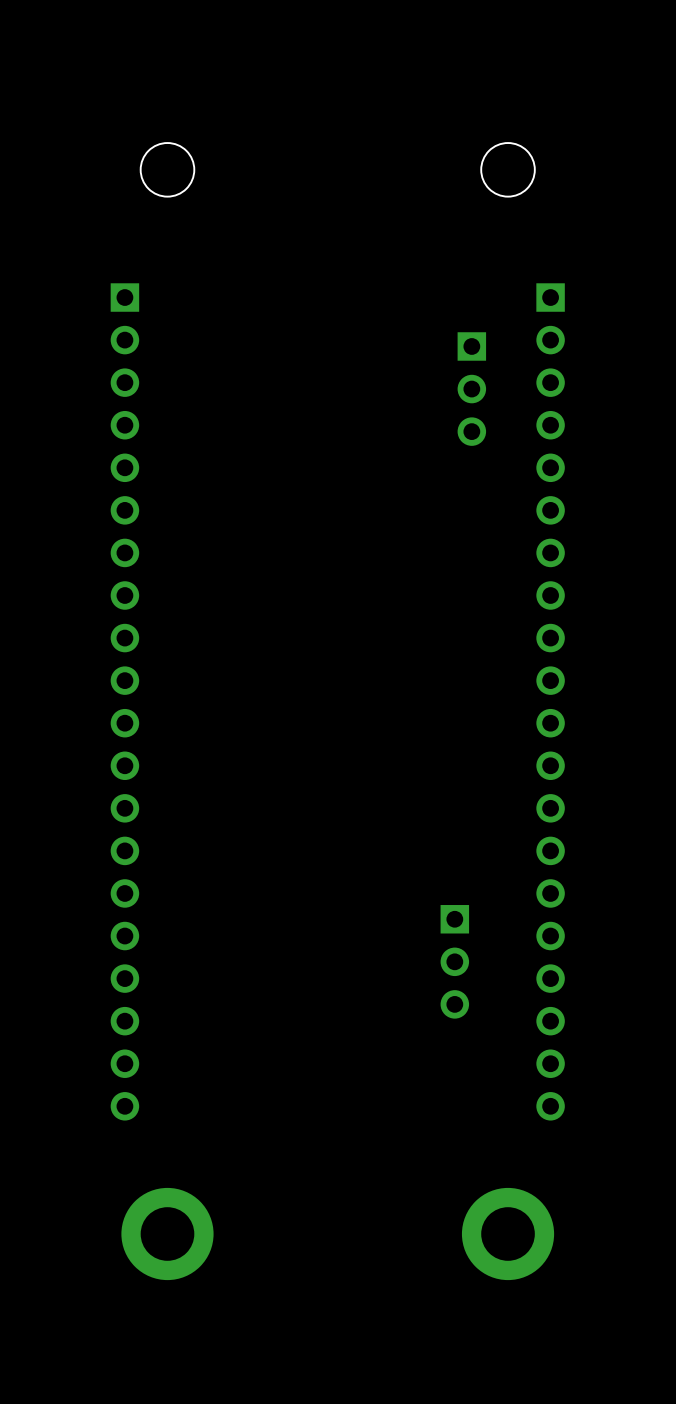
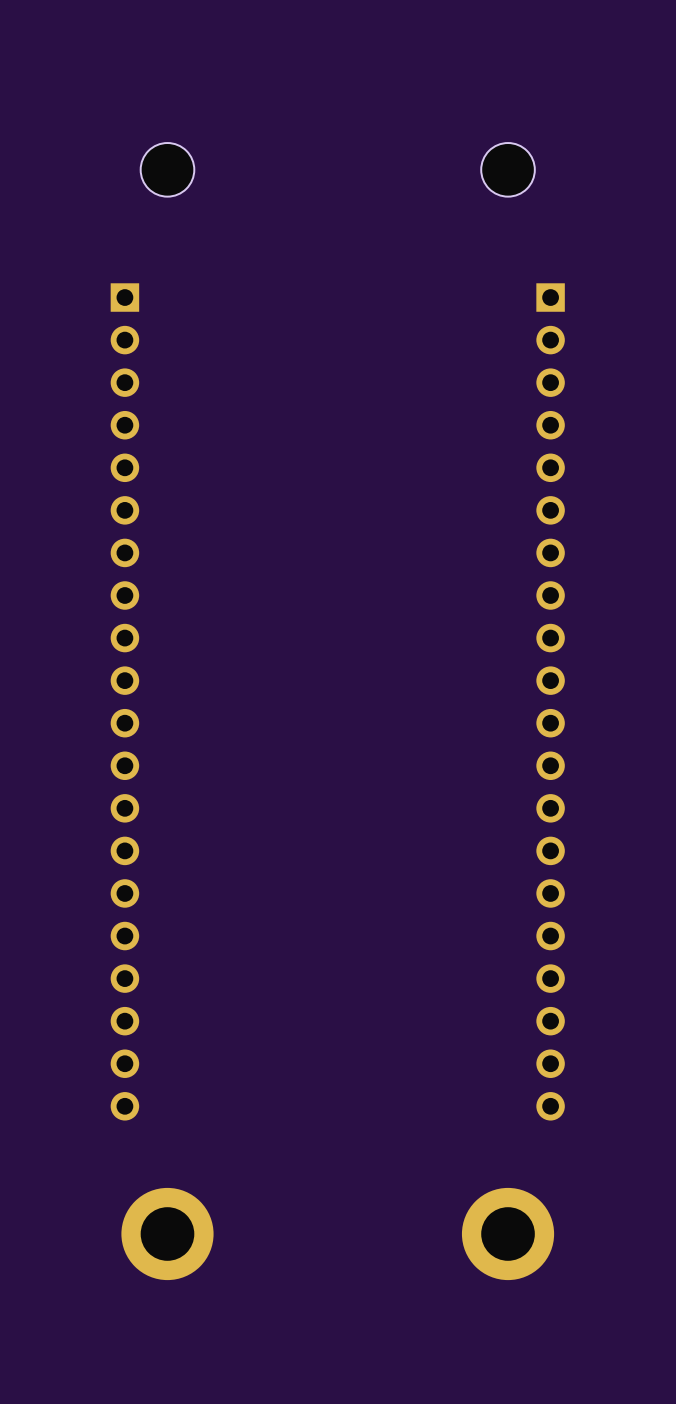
part: (471, 389) -> none
part: (454, 961) -> none

